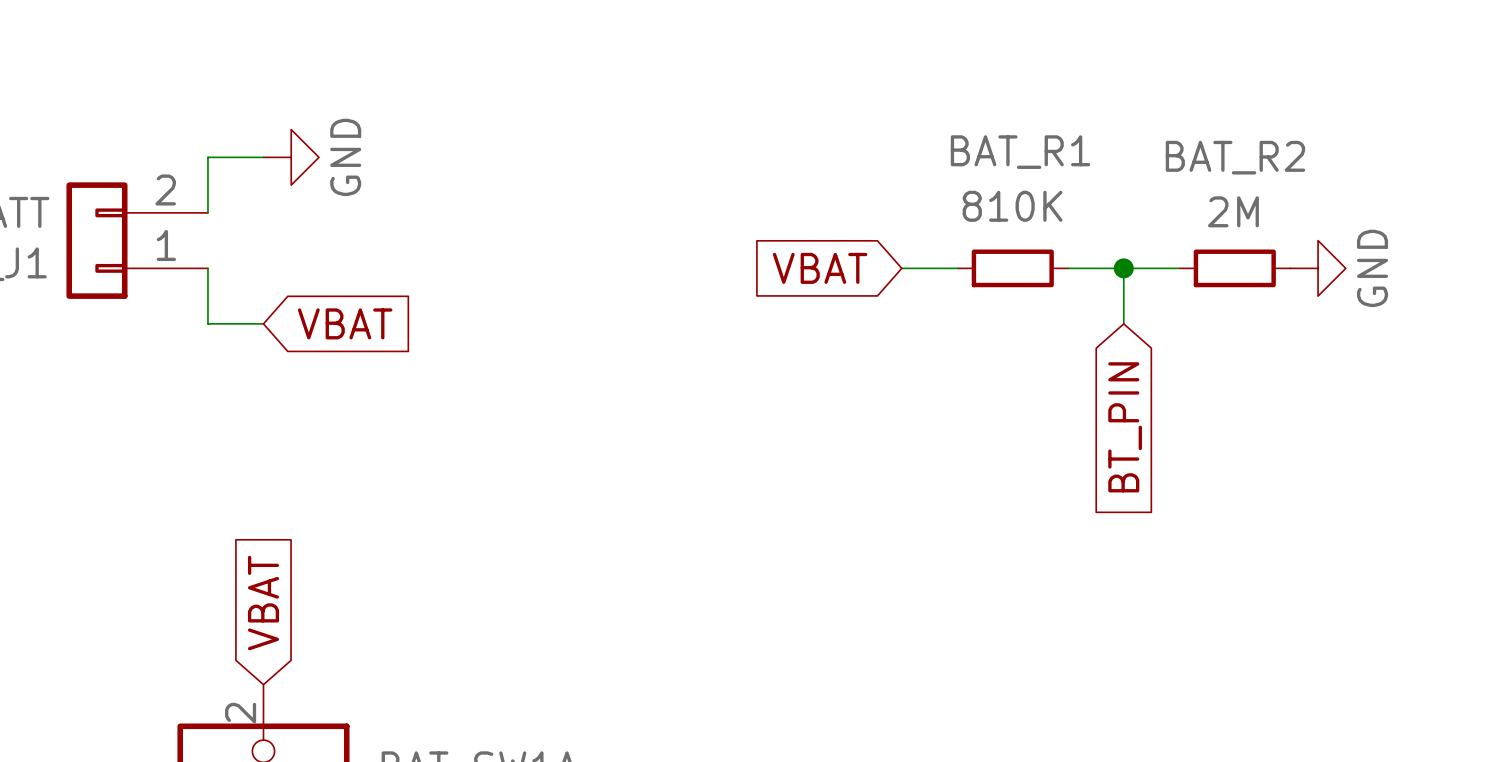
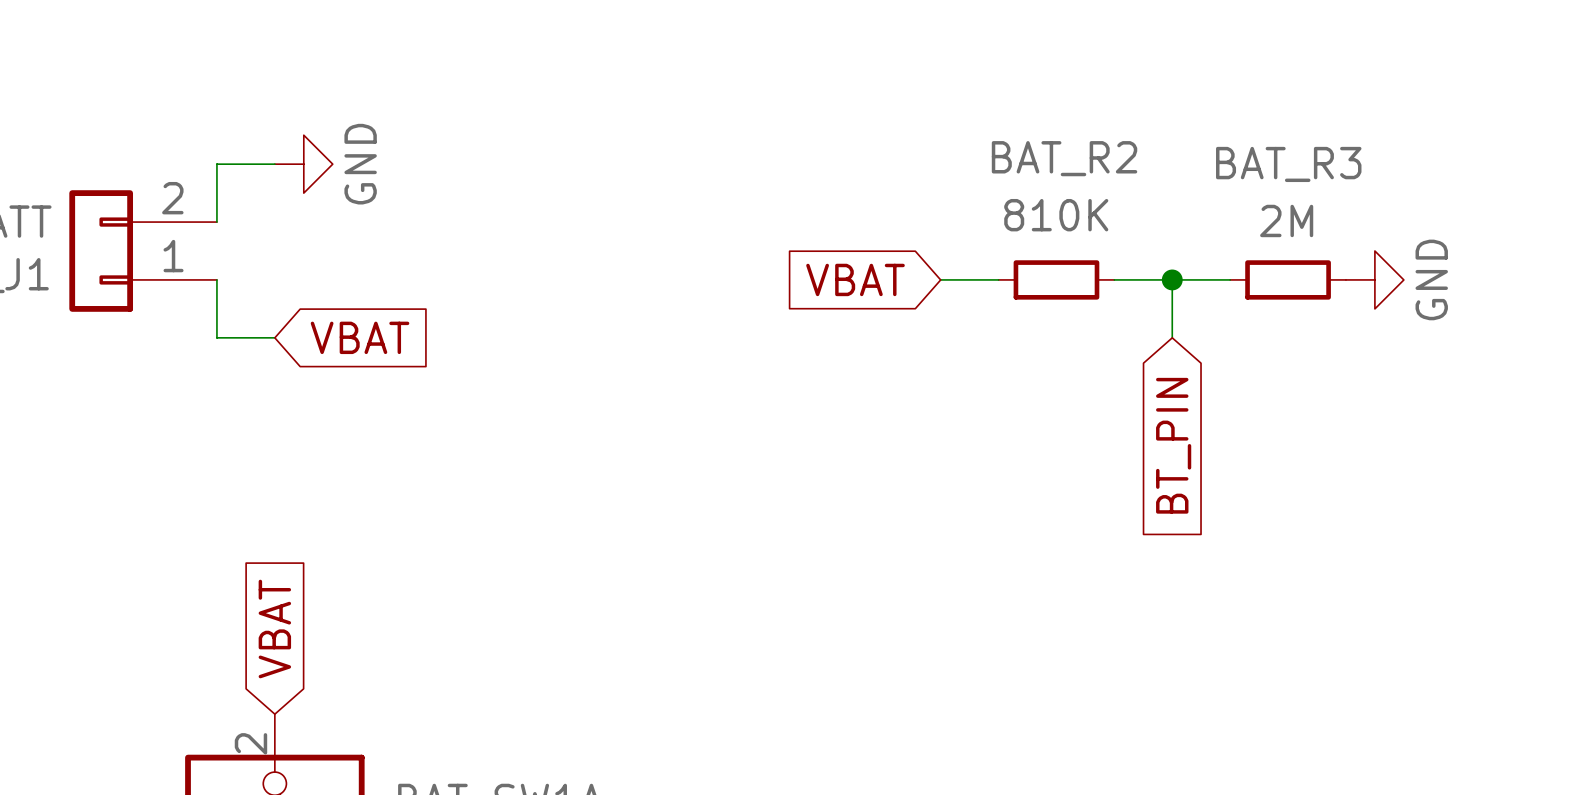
BAT_R1 name: BAT_R1 (1020, 152) -> BAT_R2 (1064, 158)
BAT_R2 name: BAT_R2 (1235, 157) -> BAT_R3 (1288, 164)

